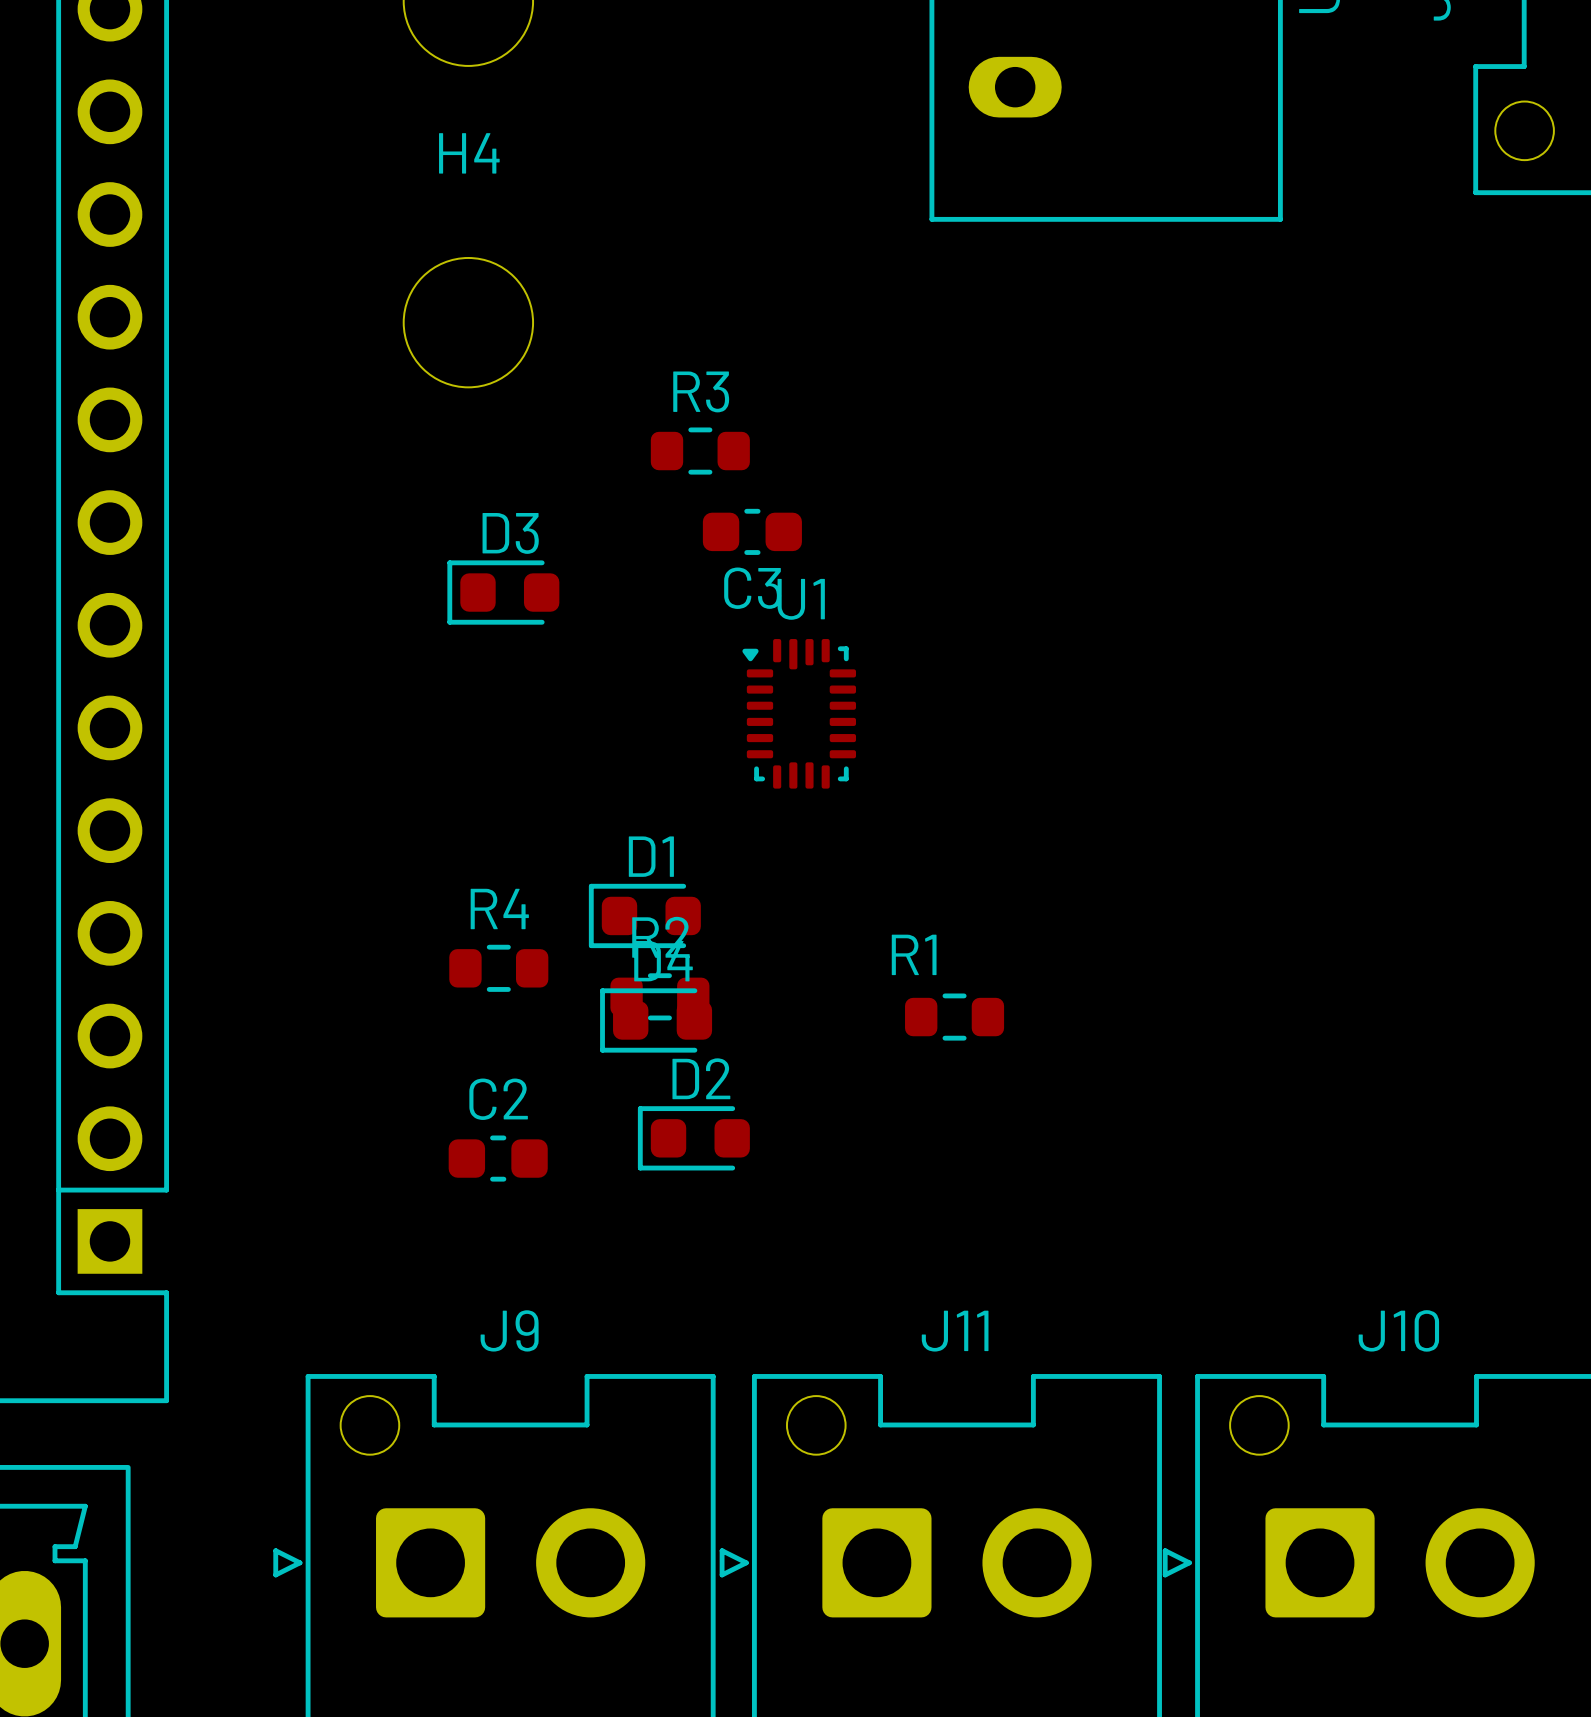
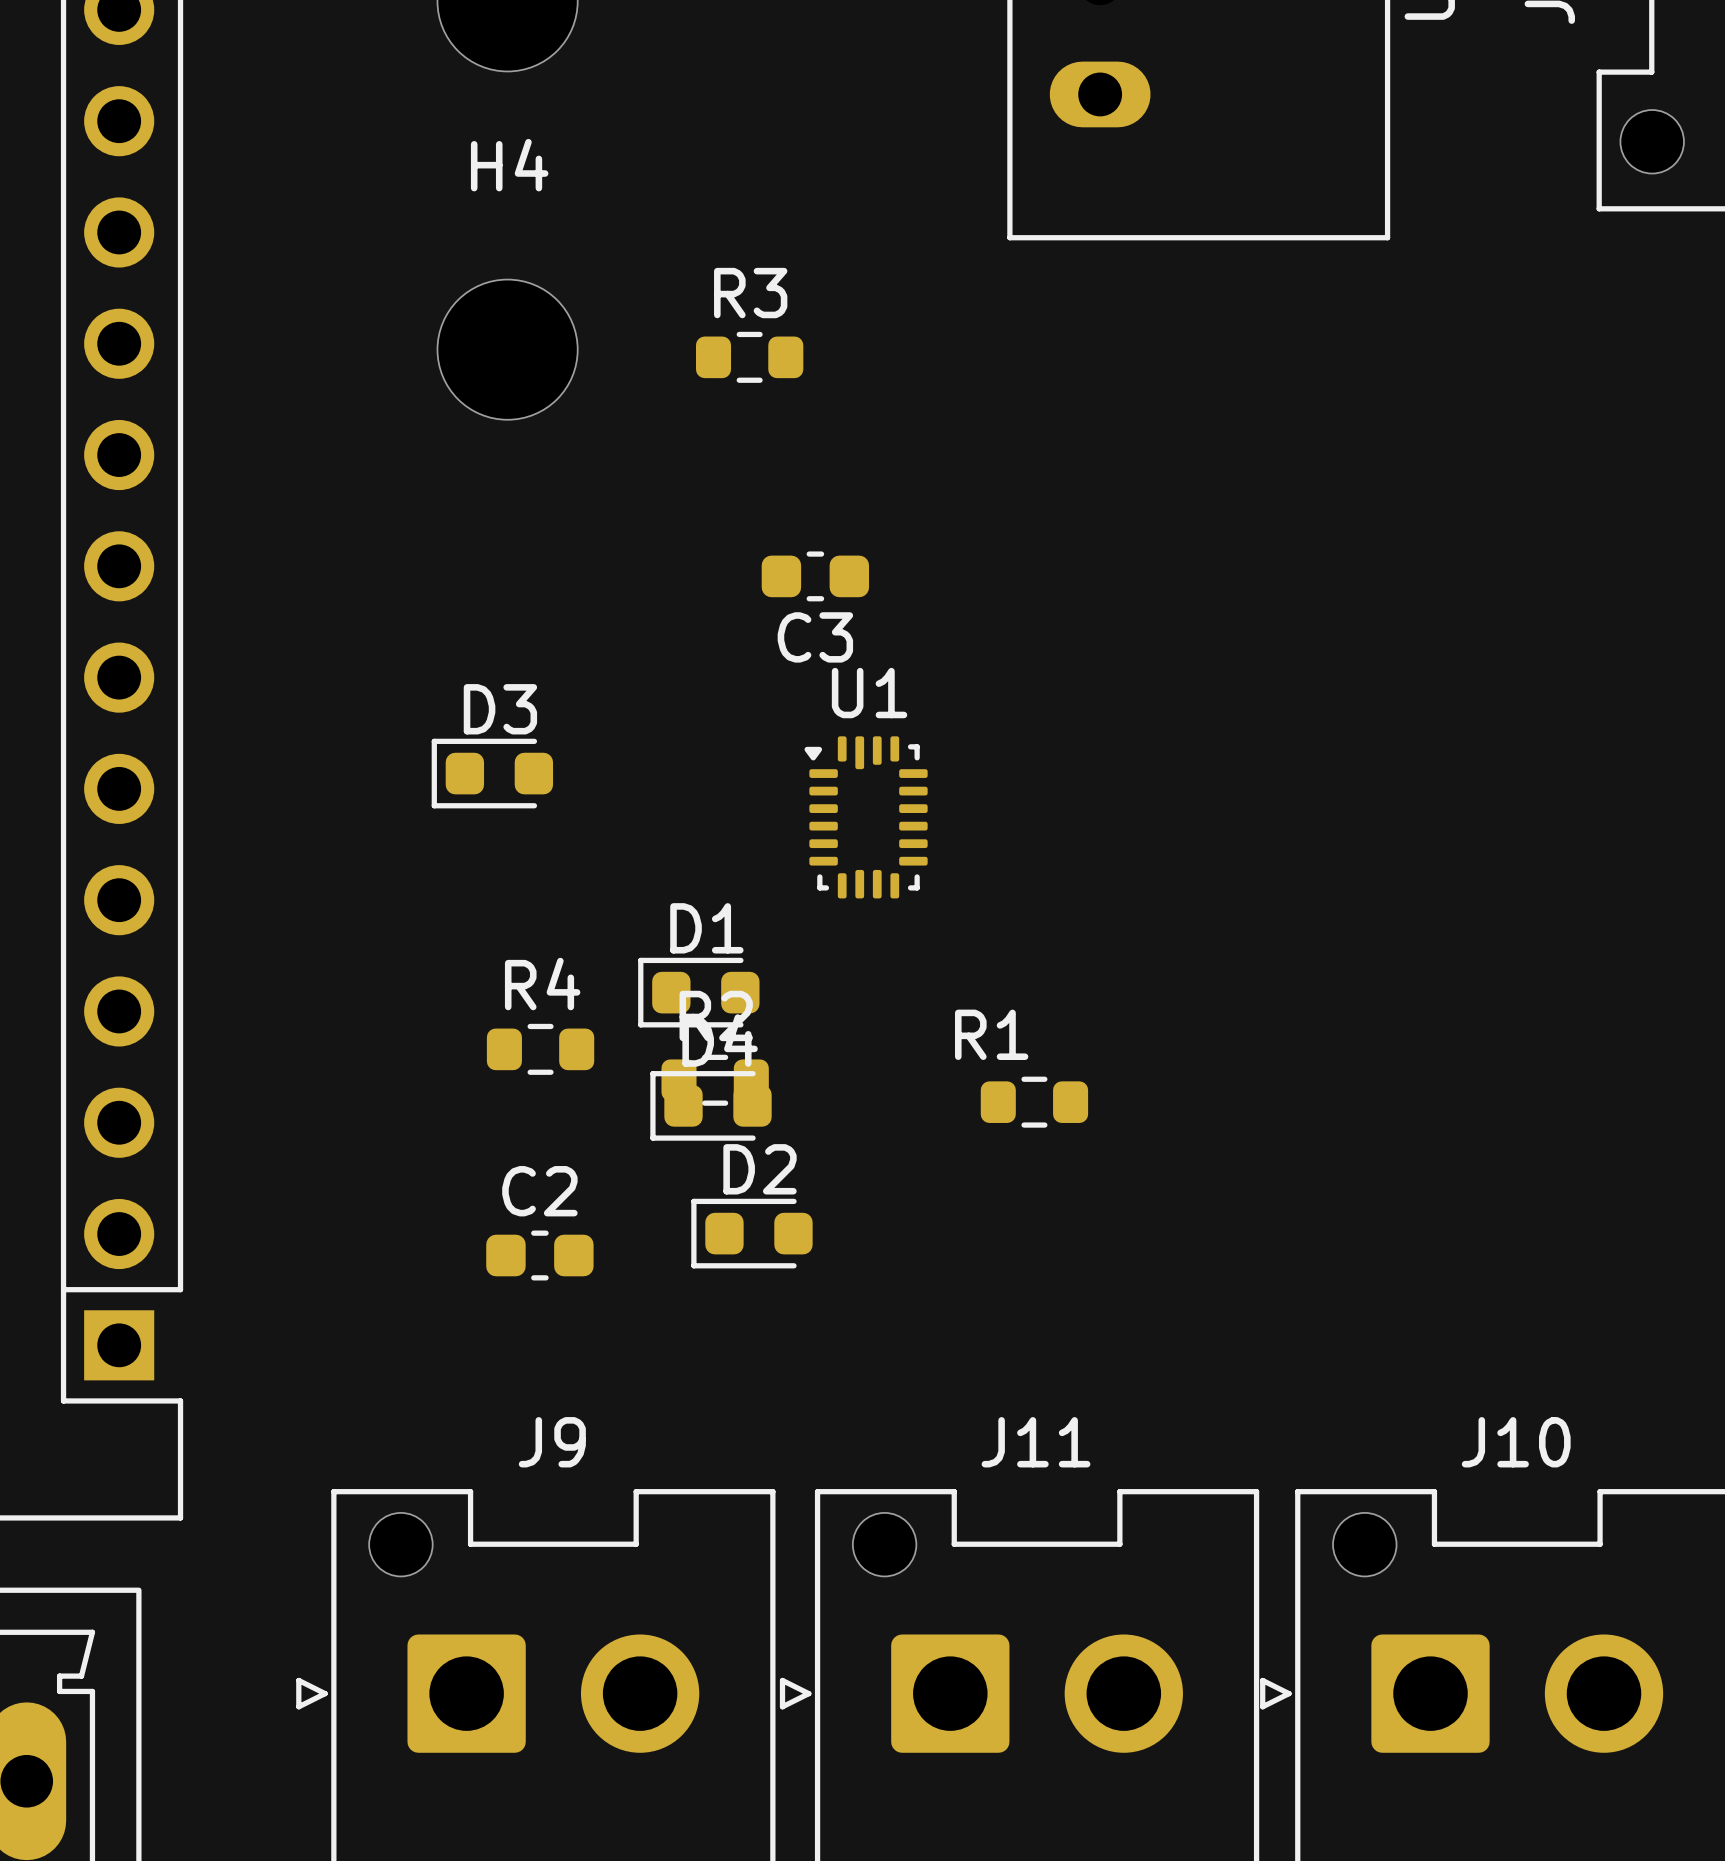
R3 position: (700, 451) -> (749, 357)
D3 position: (503, 592) -> (492, 773)
U1 position: (799, 713) -> (866, 817)

